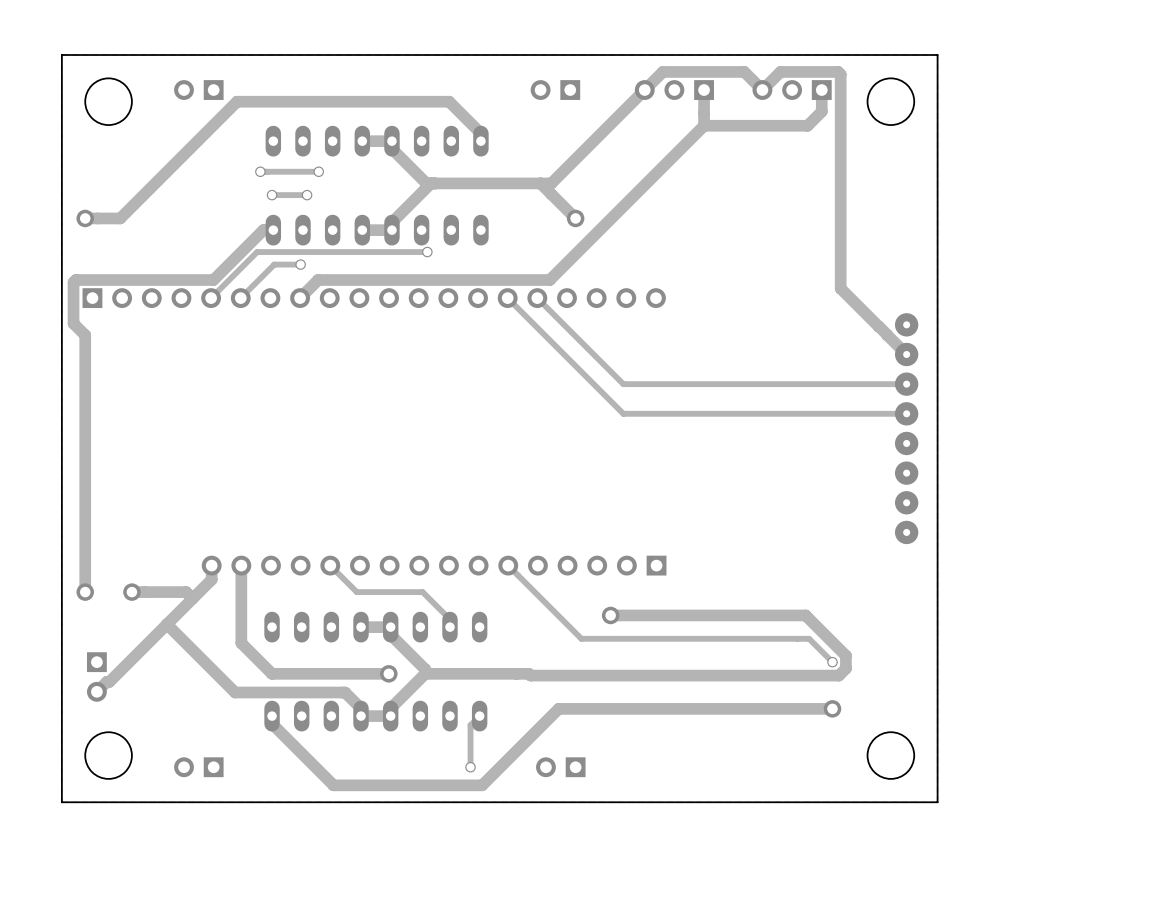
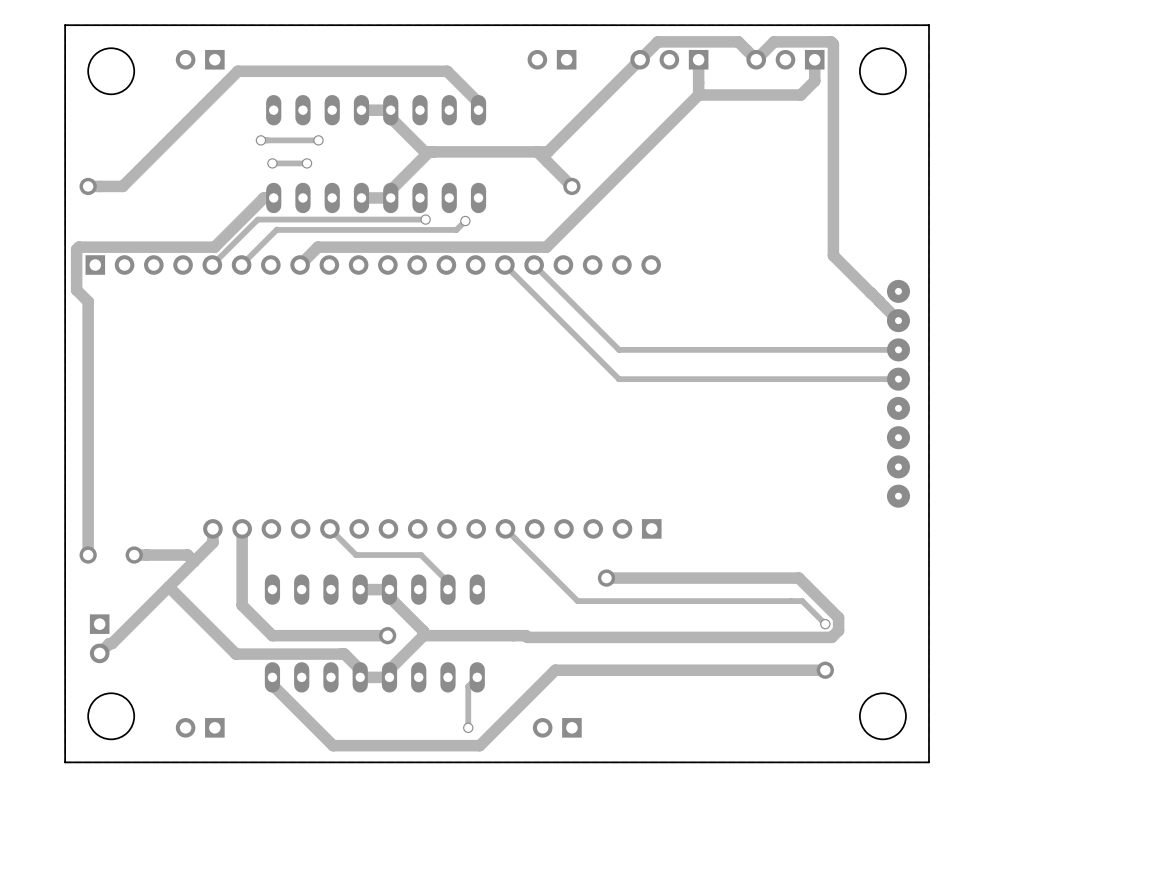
via: none -> (465, 221)
track: (300, 264) (274, 264) -> (465, 221) (456, 229) (276, 229) (274, 231)
via: (300, 264) -> none

